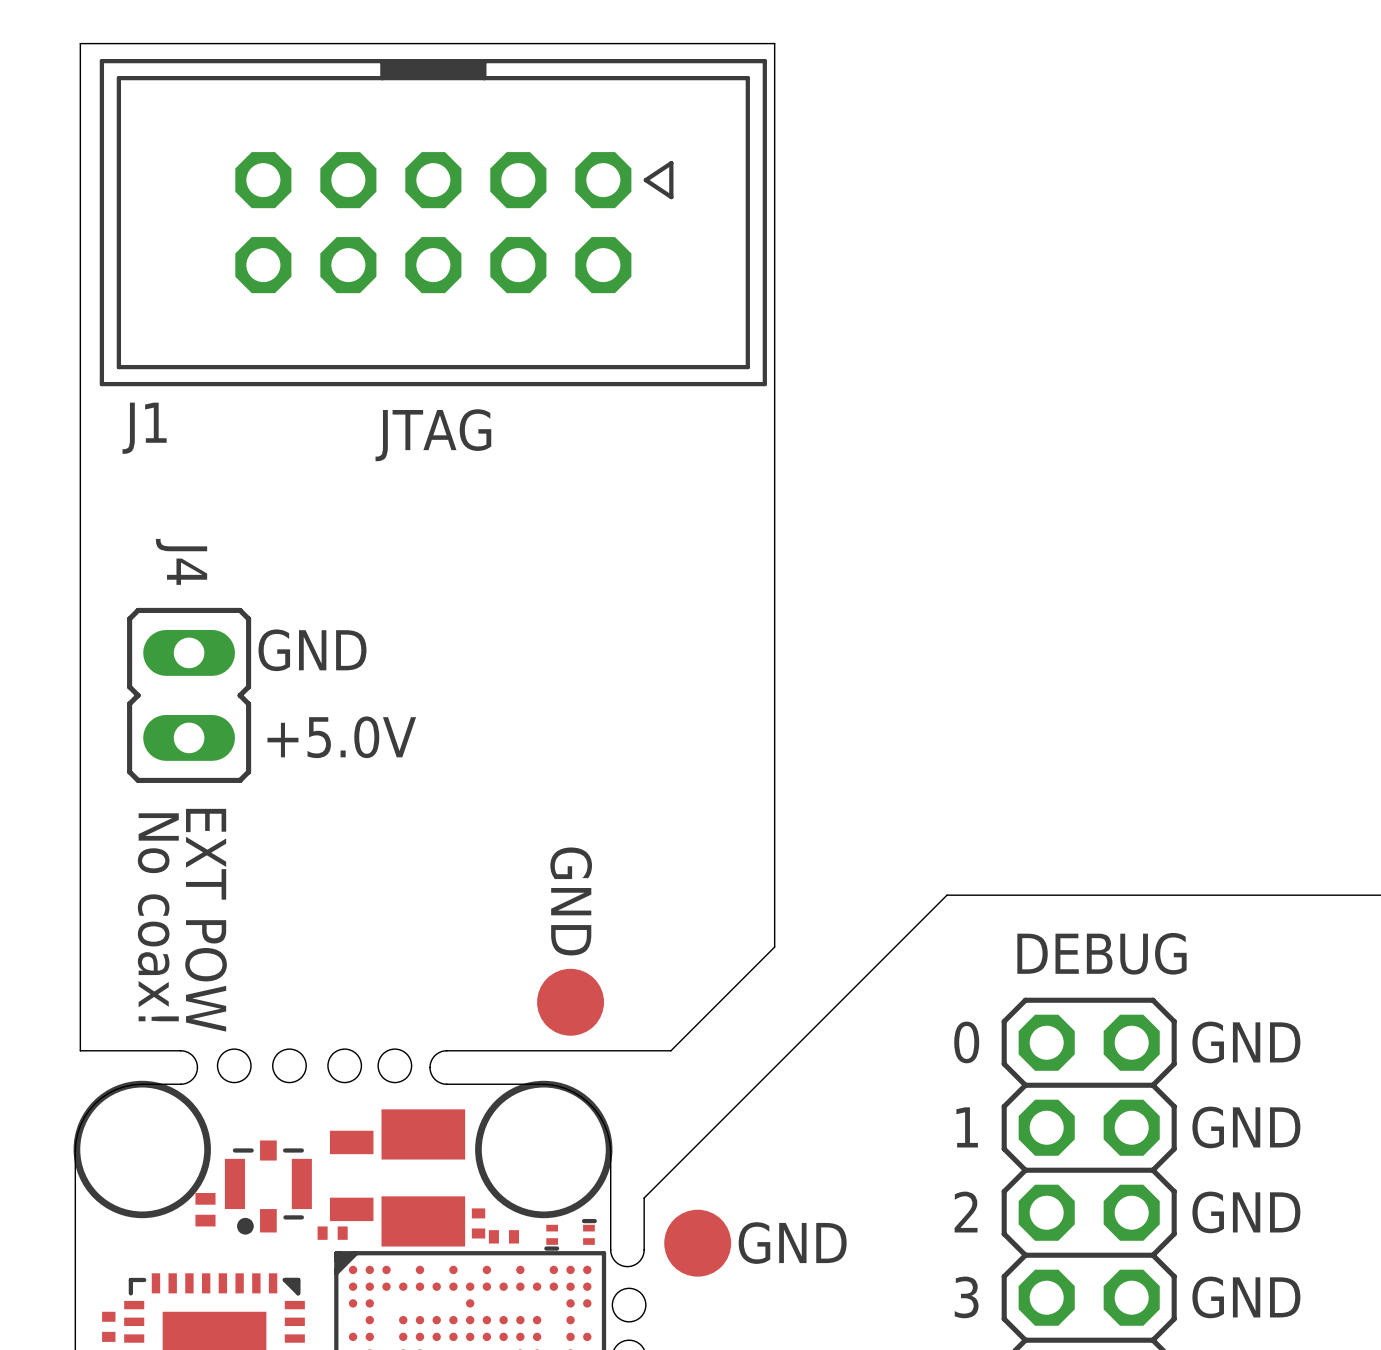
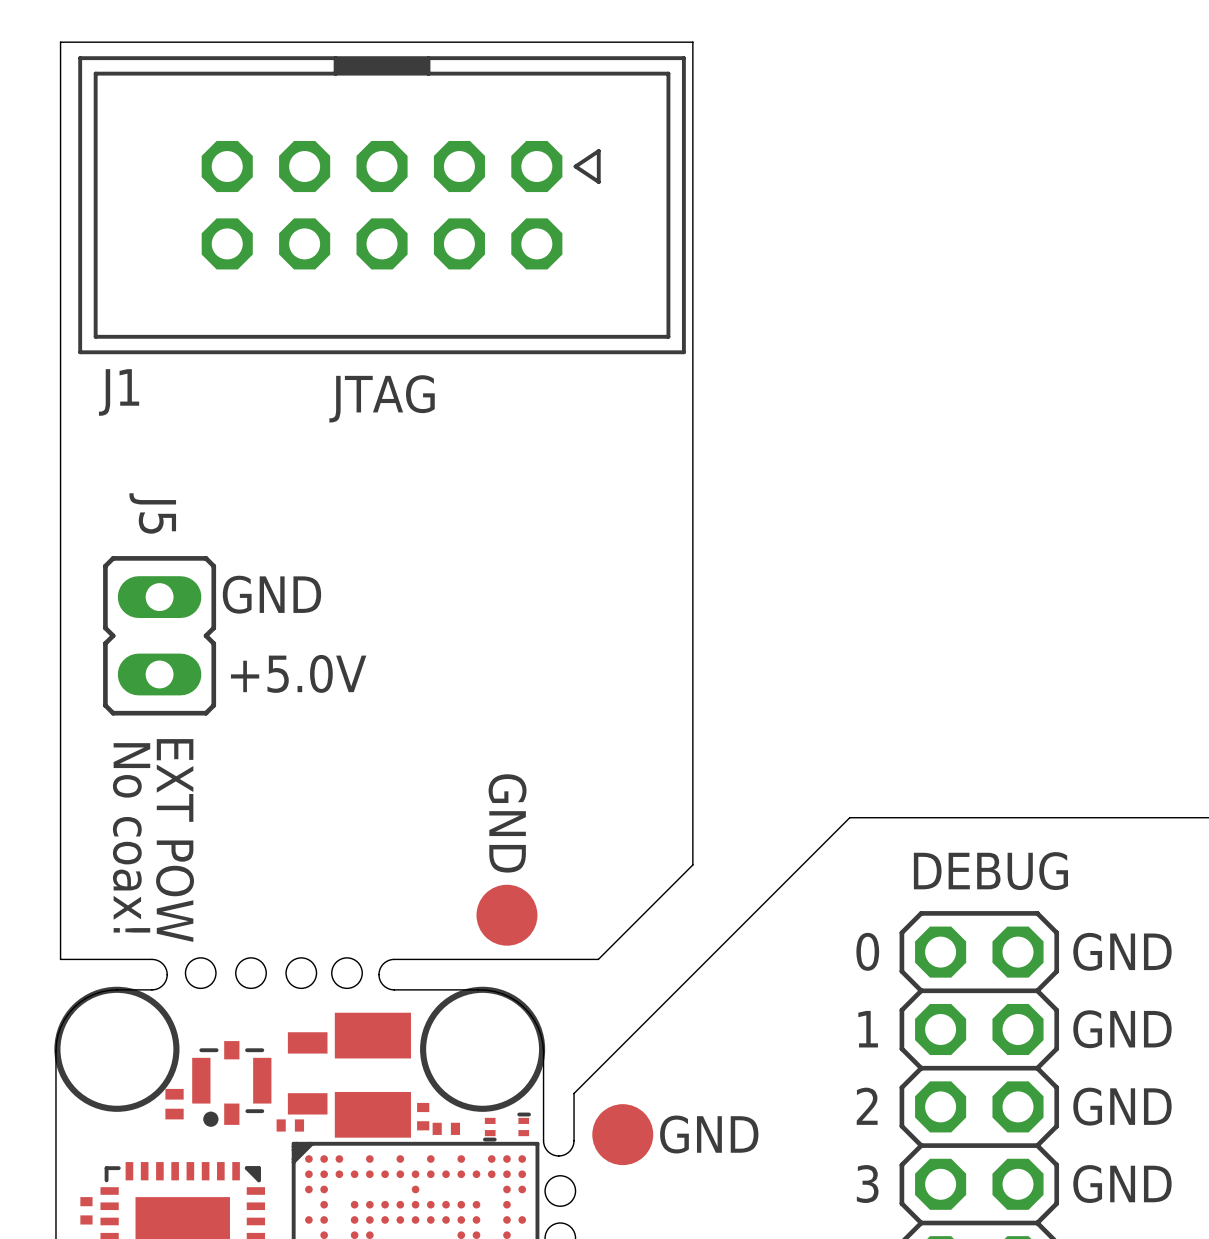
J4 name: J4 (181, 561) -> J5 (152, 513)

